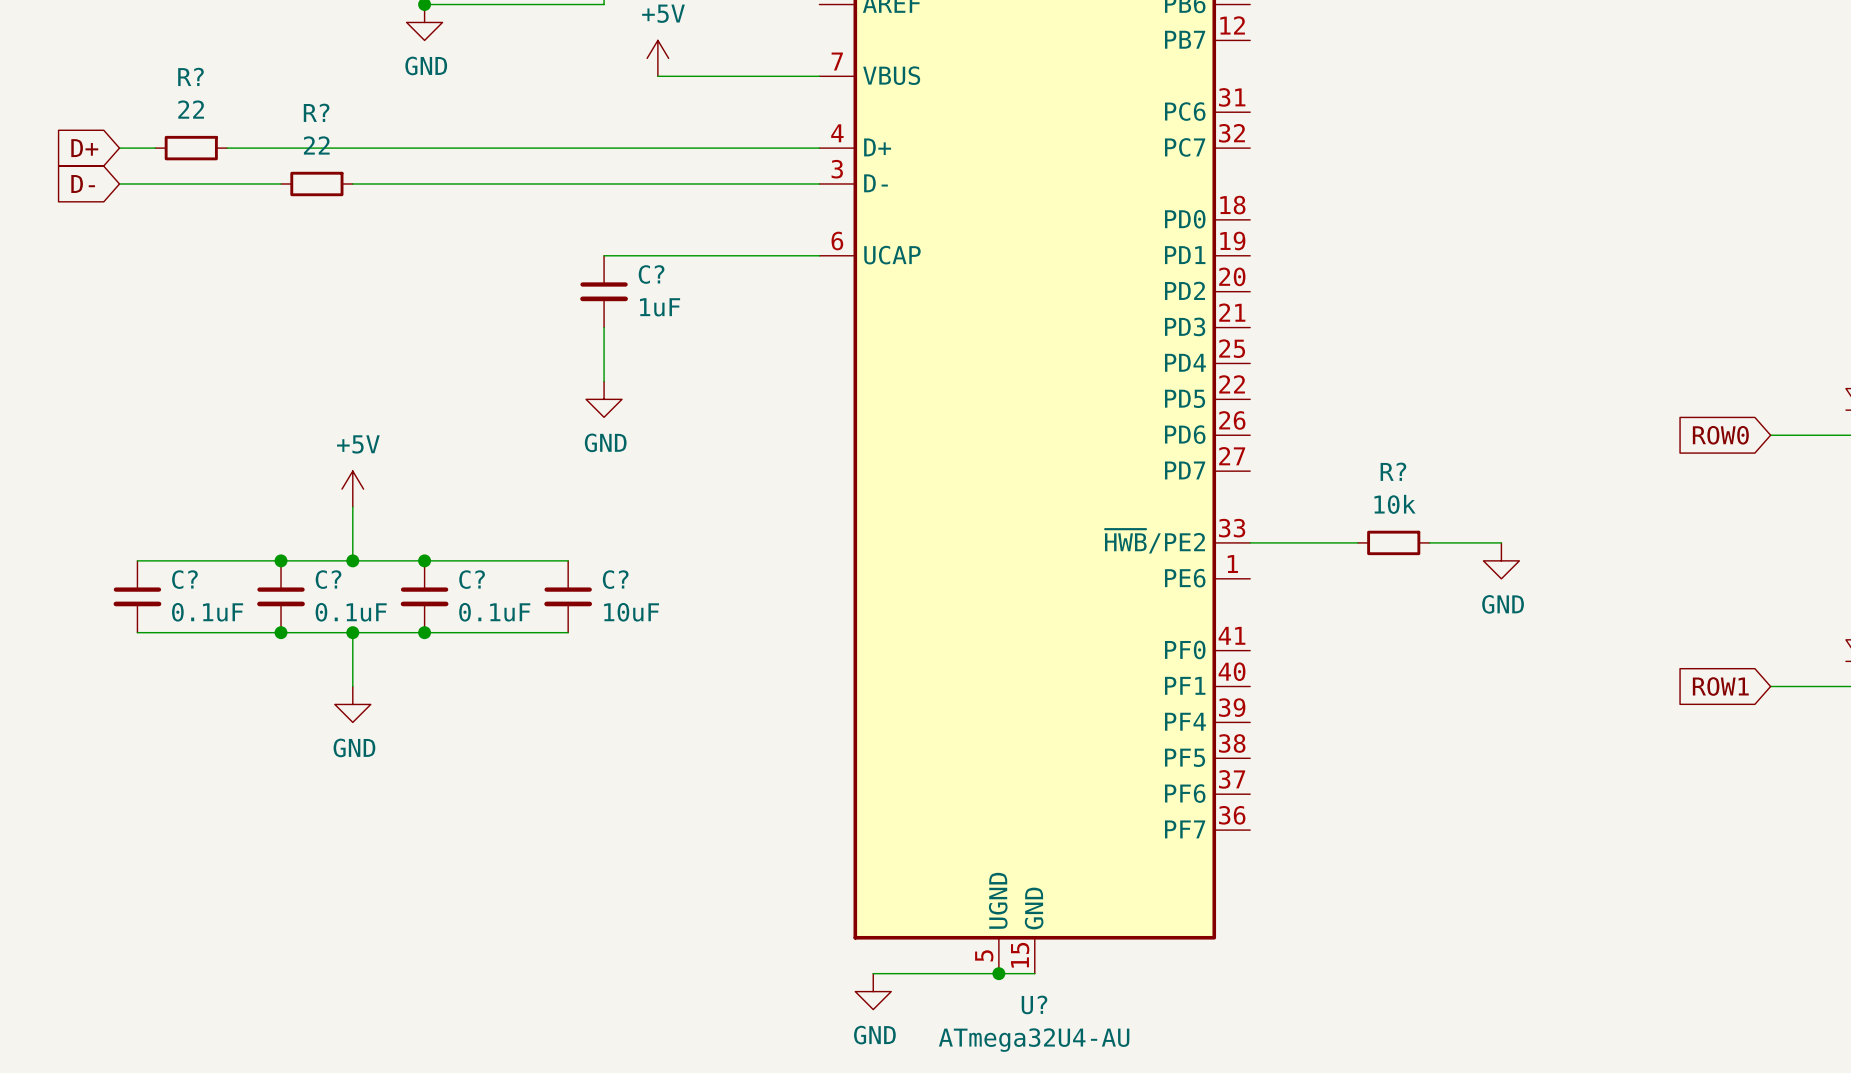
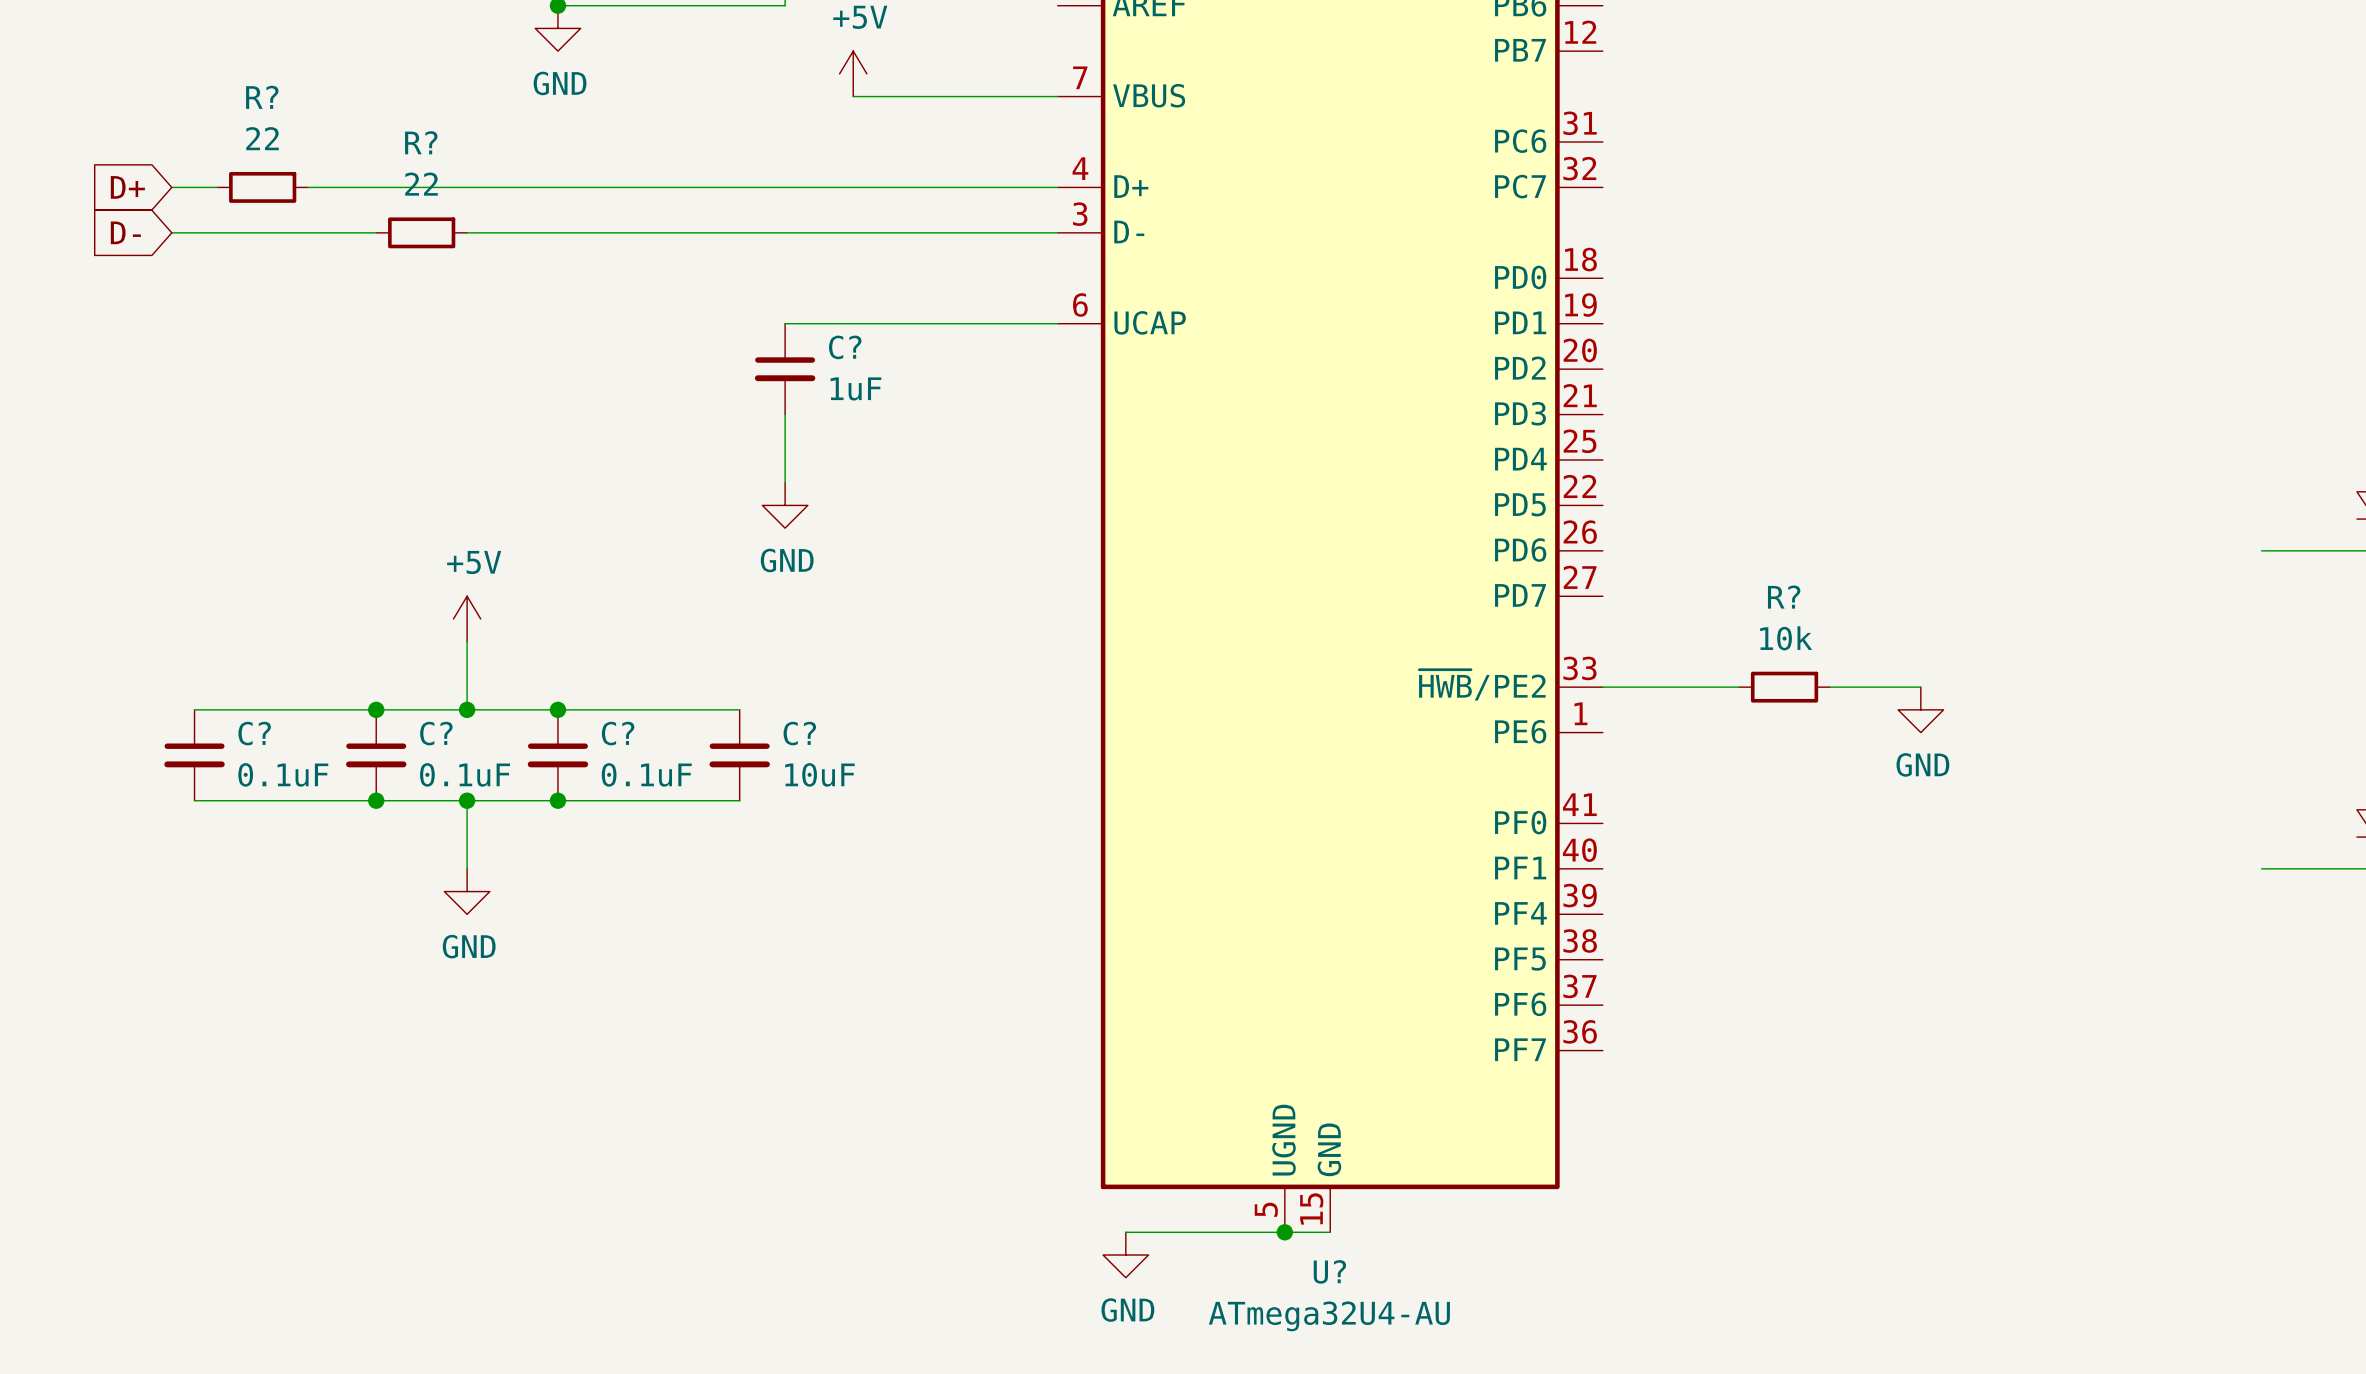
global label: ROW0 (1720, 435) -> none
global label: ROW1 (1720, 686) -> none

